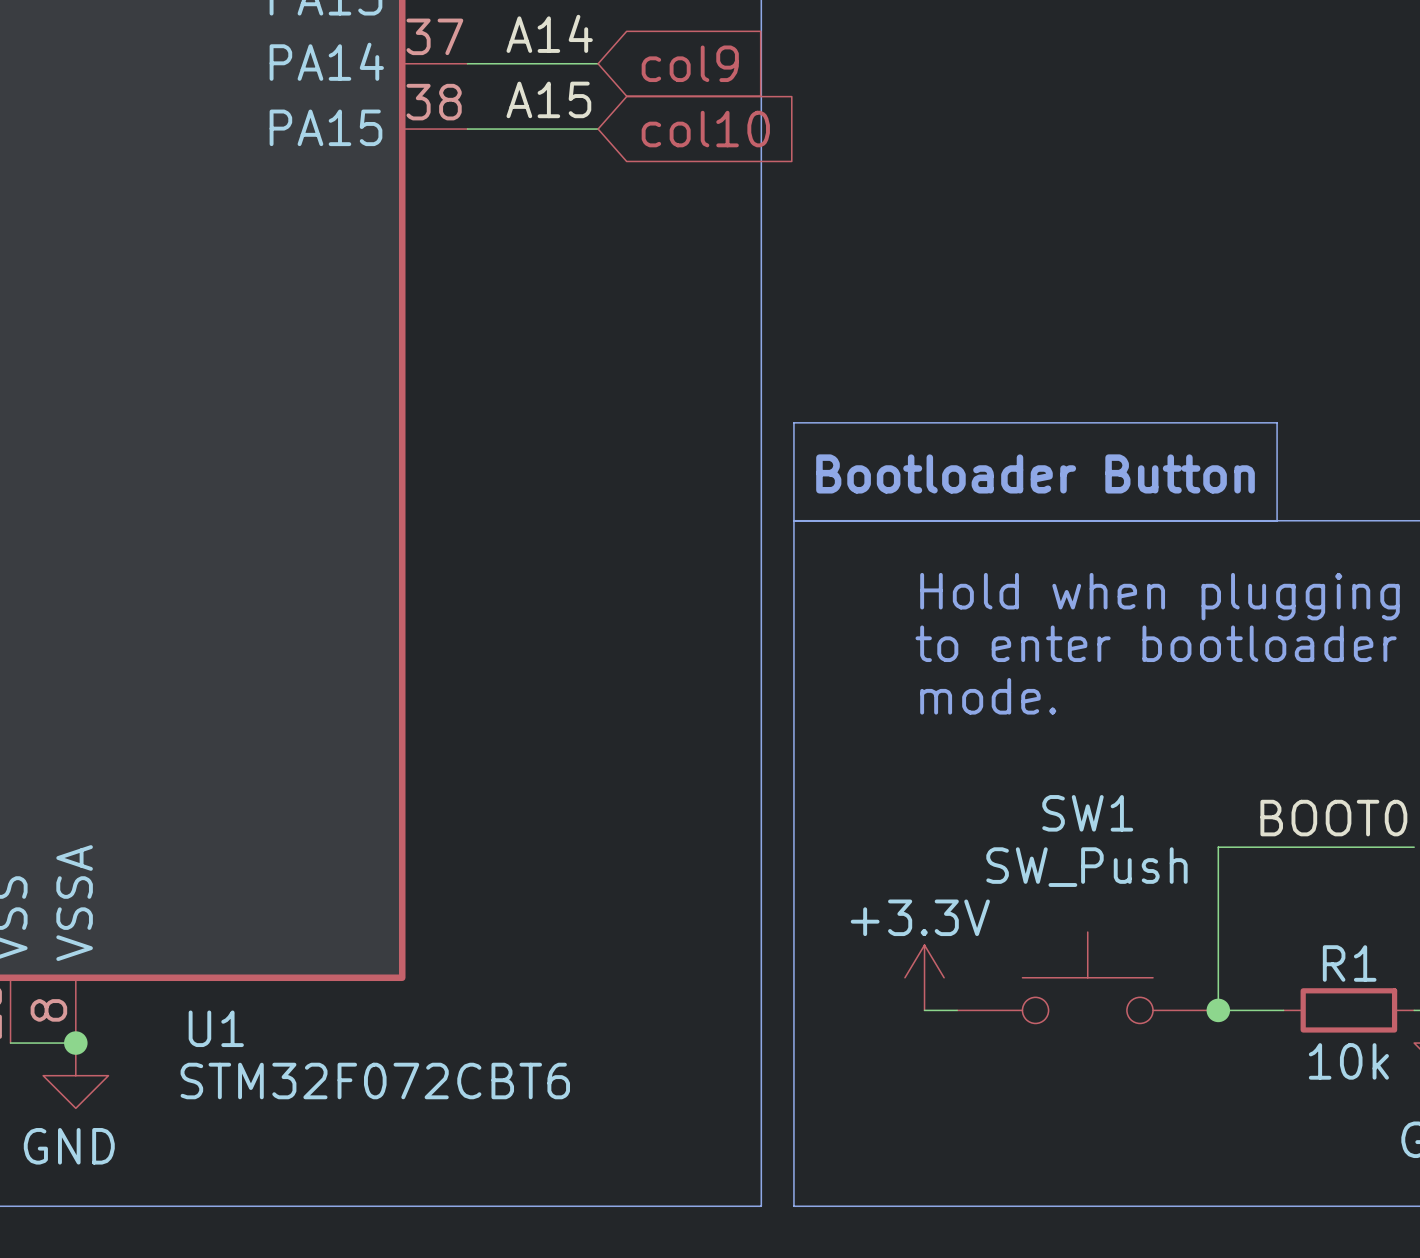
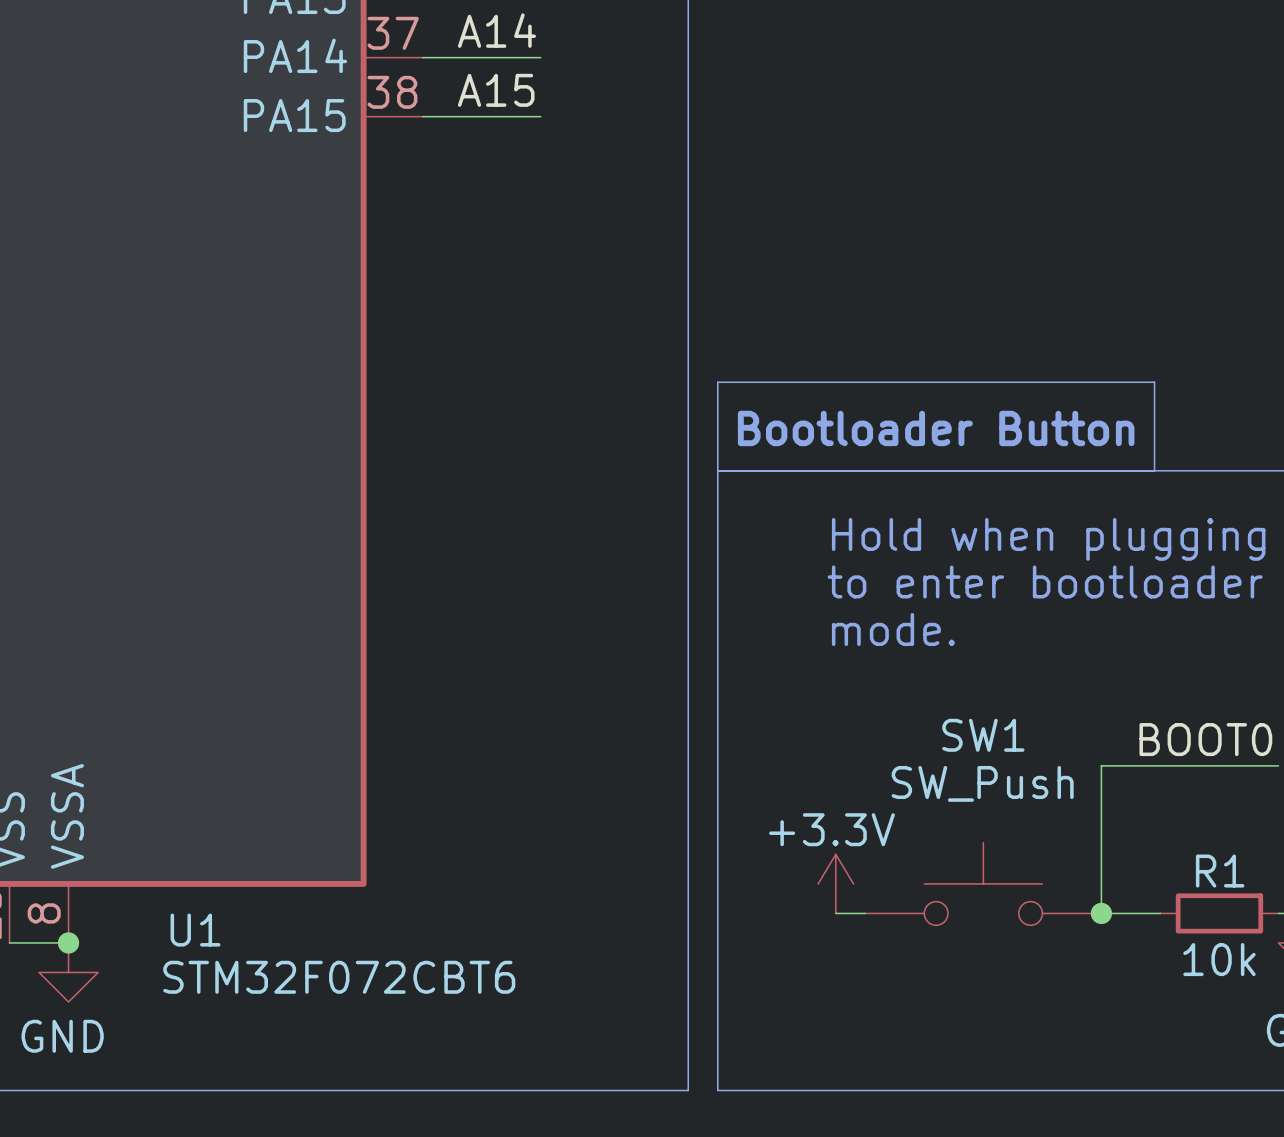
global label: col9 (690, 63) -> none
global label: col10 (705, 129) -> none

